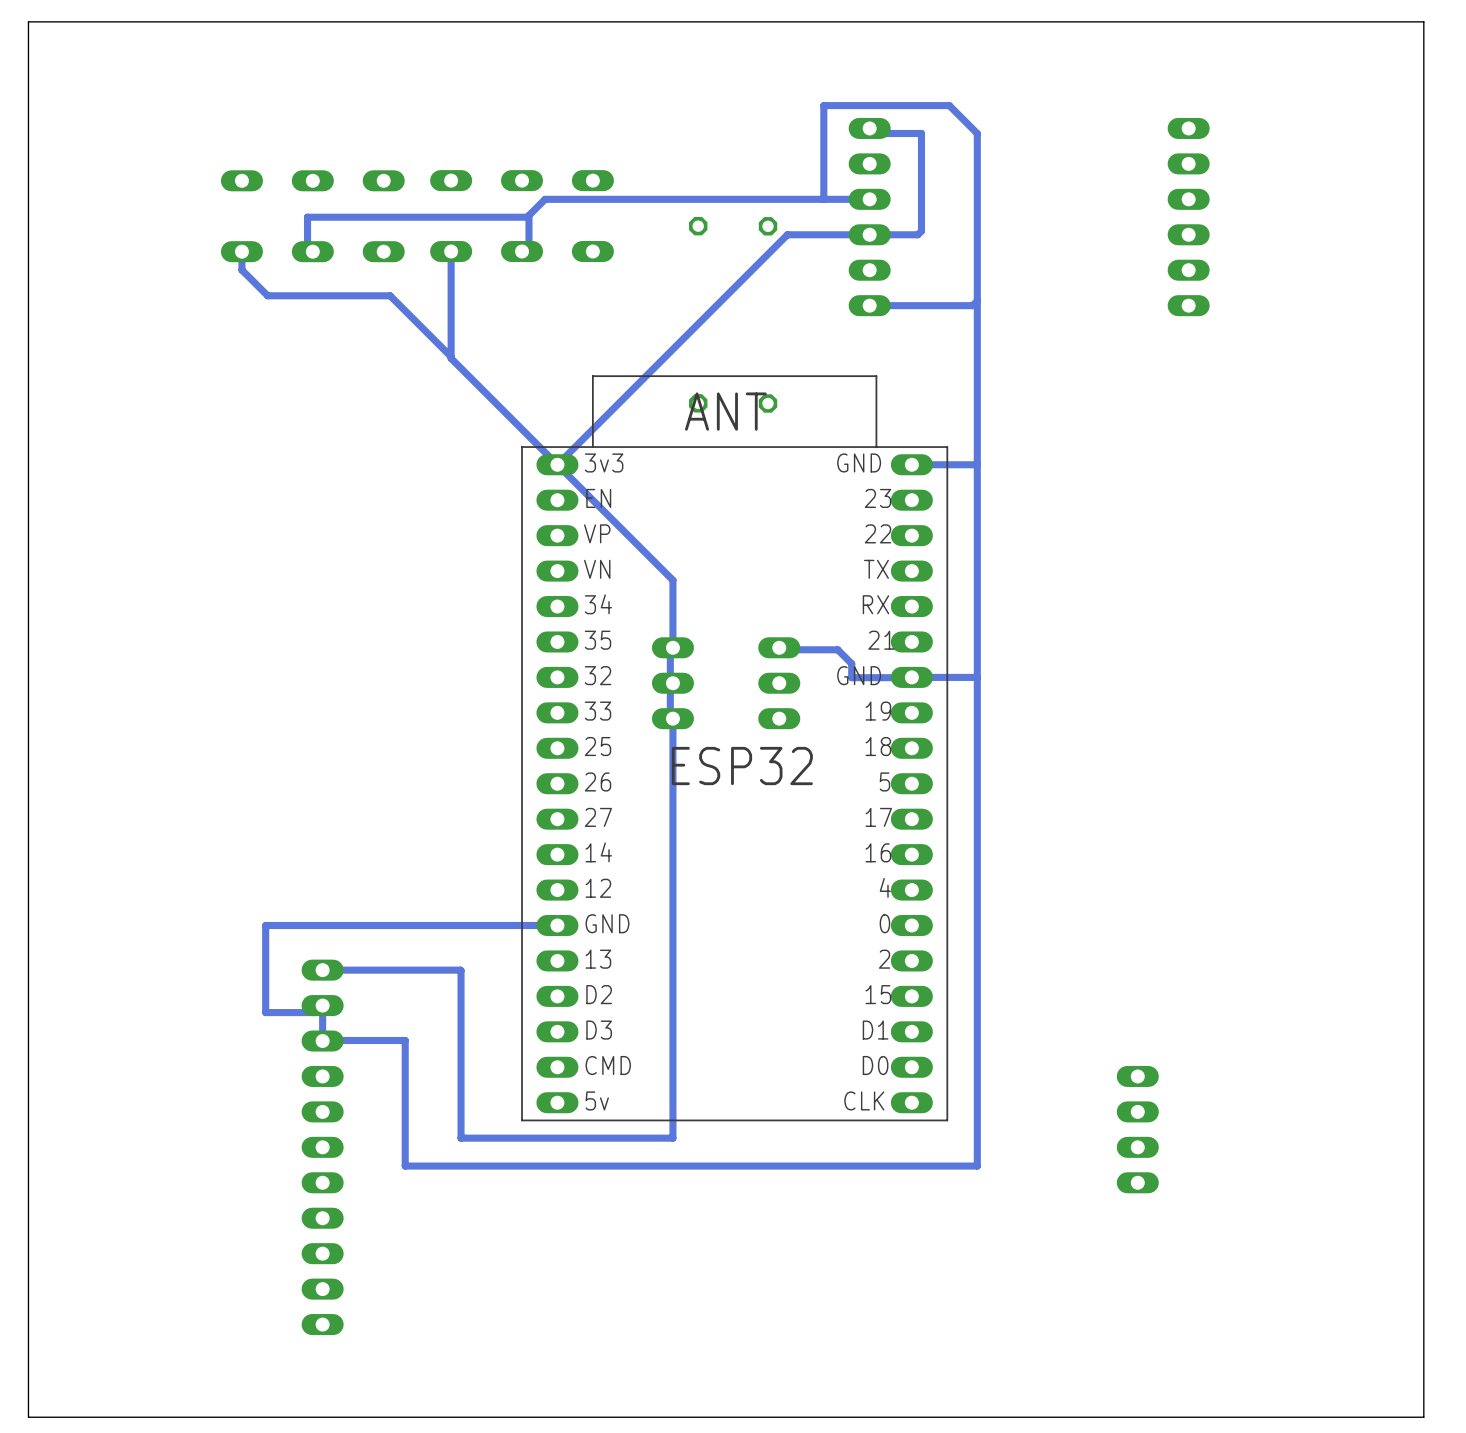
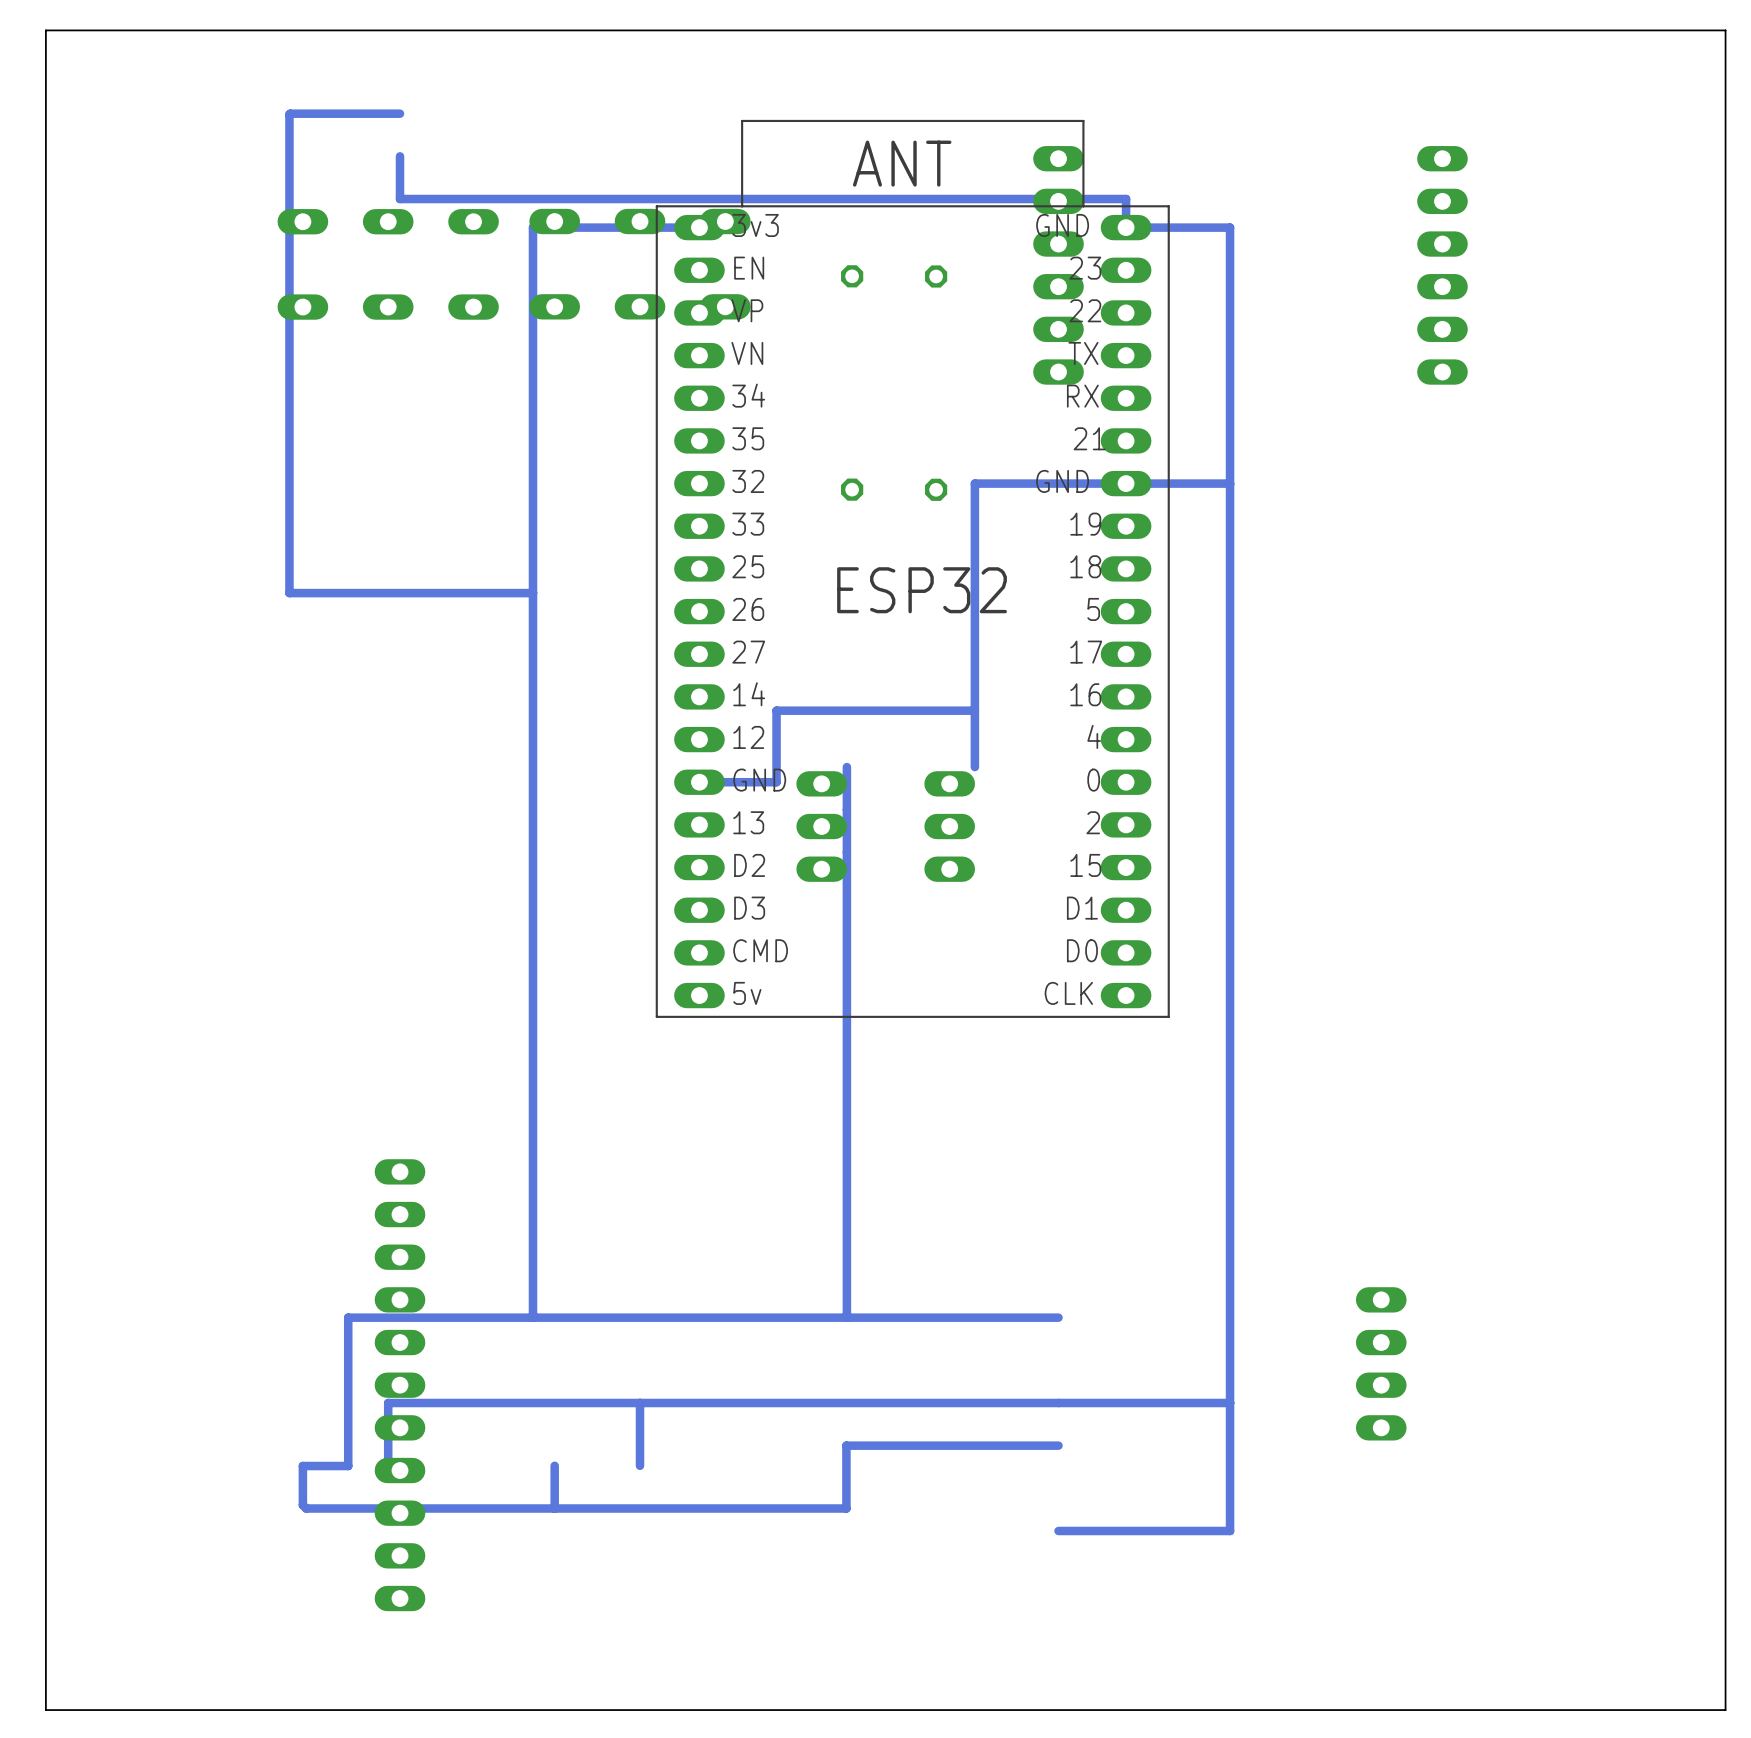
track: none -> (400, 113) (289, 114) (289, 593) (533, 593)
track: none -> (400, 156) (400, 199) (1126, 199) (1126, 227) (1230, 227) (1230, 1530) (1058, 1530)
track: (869, 128) (874, 133) (921, 133) (921, 231) (917, 234) (787, 234) (557, 464) -> none
track: none -> (699, 227) (533, 227) (533, 1317)
track: (823, 199) (823, 105) (949, 105) (977, 133) (977, 1166) (405, 1166) (405, 1040) (322, 1040) -> none
track: (869, 199) (545, 199) (527, 217) (307, 217) (307, 246) (312, 251) -> none
track: (528, 215) (528, 244) (522, 251) -> none
track: (241, 251) (241, 270) (267, 295) (390, 295) (451, 356) -> none
track: (451, 251) (451, 358) (672, 580) (672, 647) (670, 650) (670, 716) (672, 718) (672, 1138) (461, 1138) (461, 970) (322, 970) -> none
track: (977, 300) (972, 305) (869, 305) -> none
track: none -> (1230, 483) (974, 483) (974, 767)
track: (977, 464) (911, 464) -> none
track: none -> (974, 710) (776, 710) (776, 782) (699, 782)
track: none -> (846, 767) (846, 1317)
track: (779, 647) (781, 649) (837, 649) (851, 663) (851, 677) (977, 677) -> none
part position: (734, 748) -> (912, 568)
track: (557, 925) (265, 925) (265, 1012) (315, 1012) (322, 1005) (322, 1041) -> none
track: none -> (1058, 1317) (348, 1317) (348, 1466) (302, 1466) (302, 1505) (306, 1508) (846, 1508) (846, 1445) (1058, 1445)
track: none -> (640, 1402) (640, 1465)
track: none -> (1230, 1402) (388, 1402) (388, 1466)
track: none -> (554, 1465) (554, 1508)

